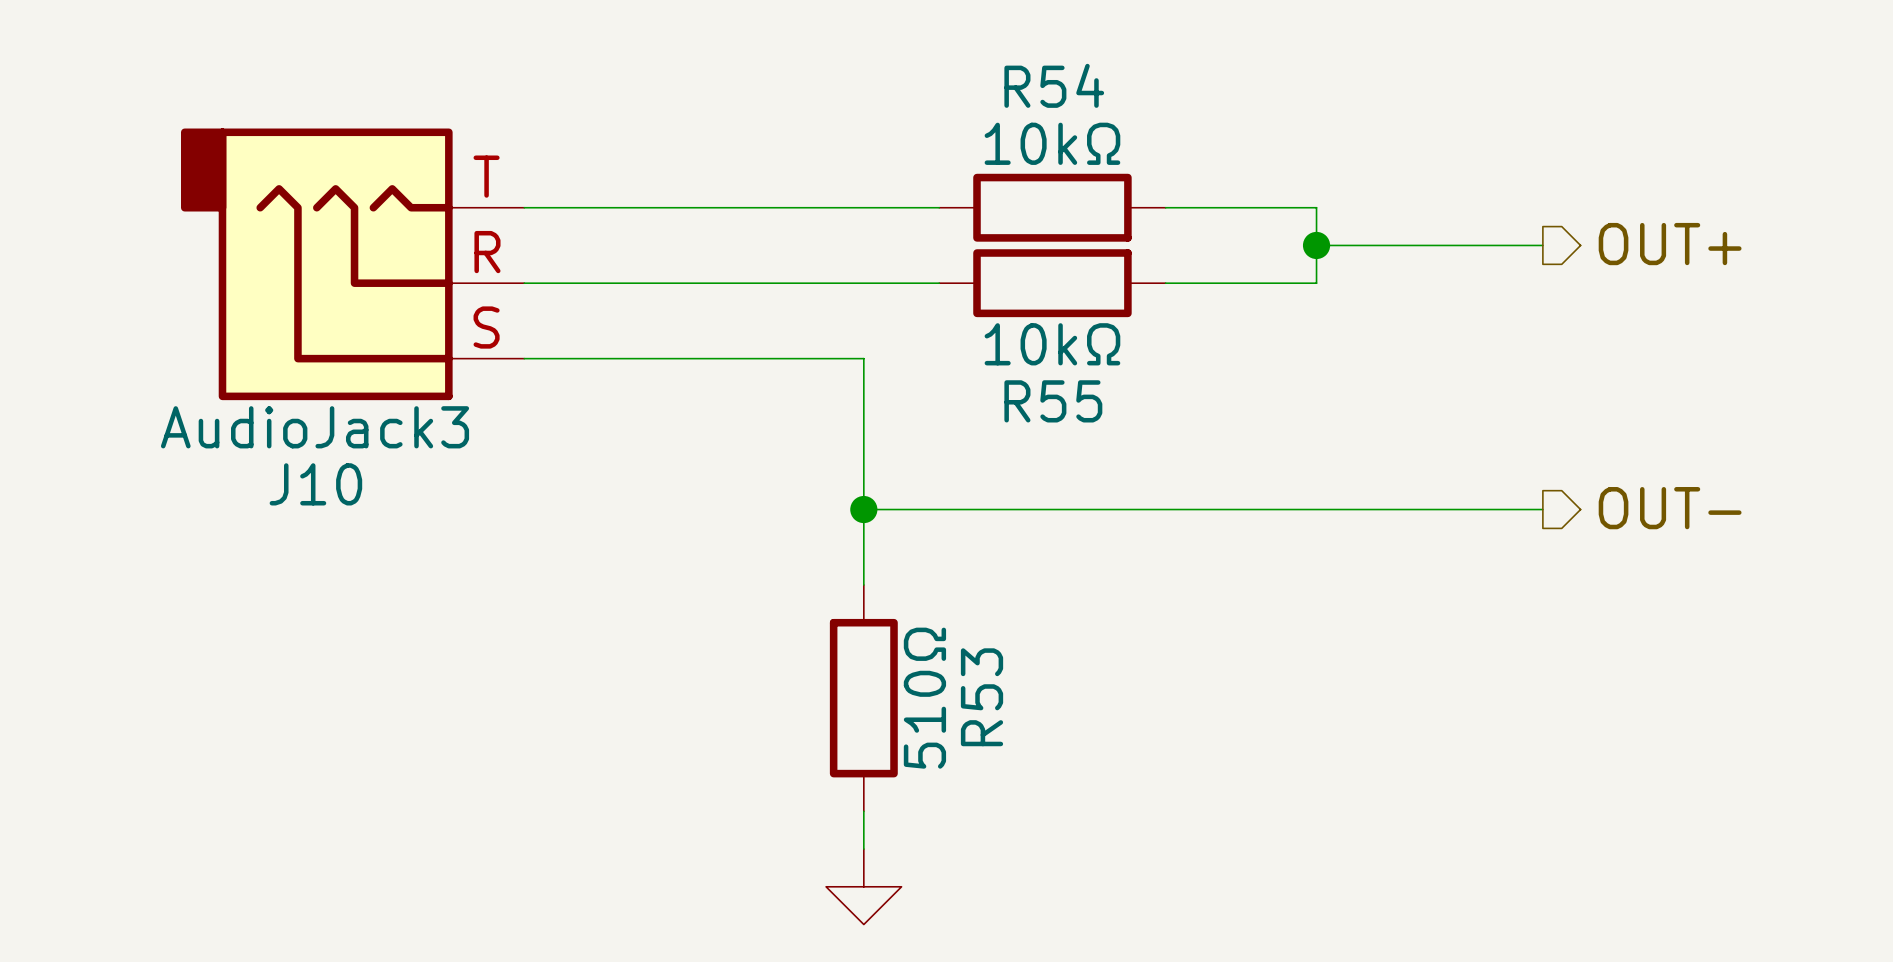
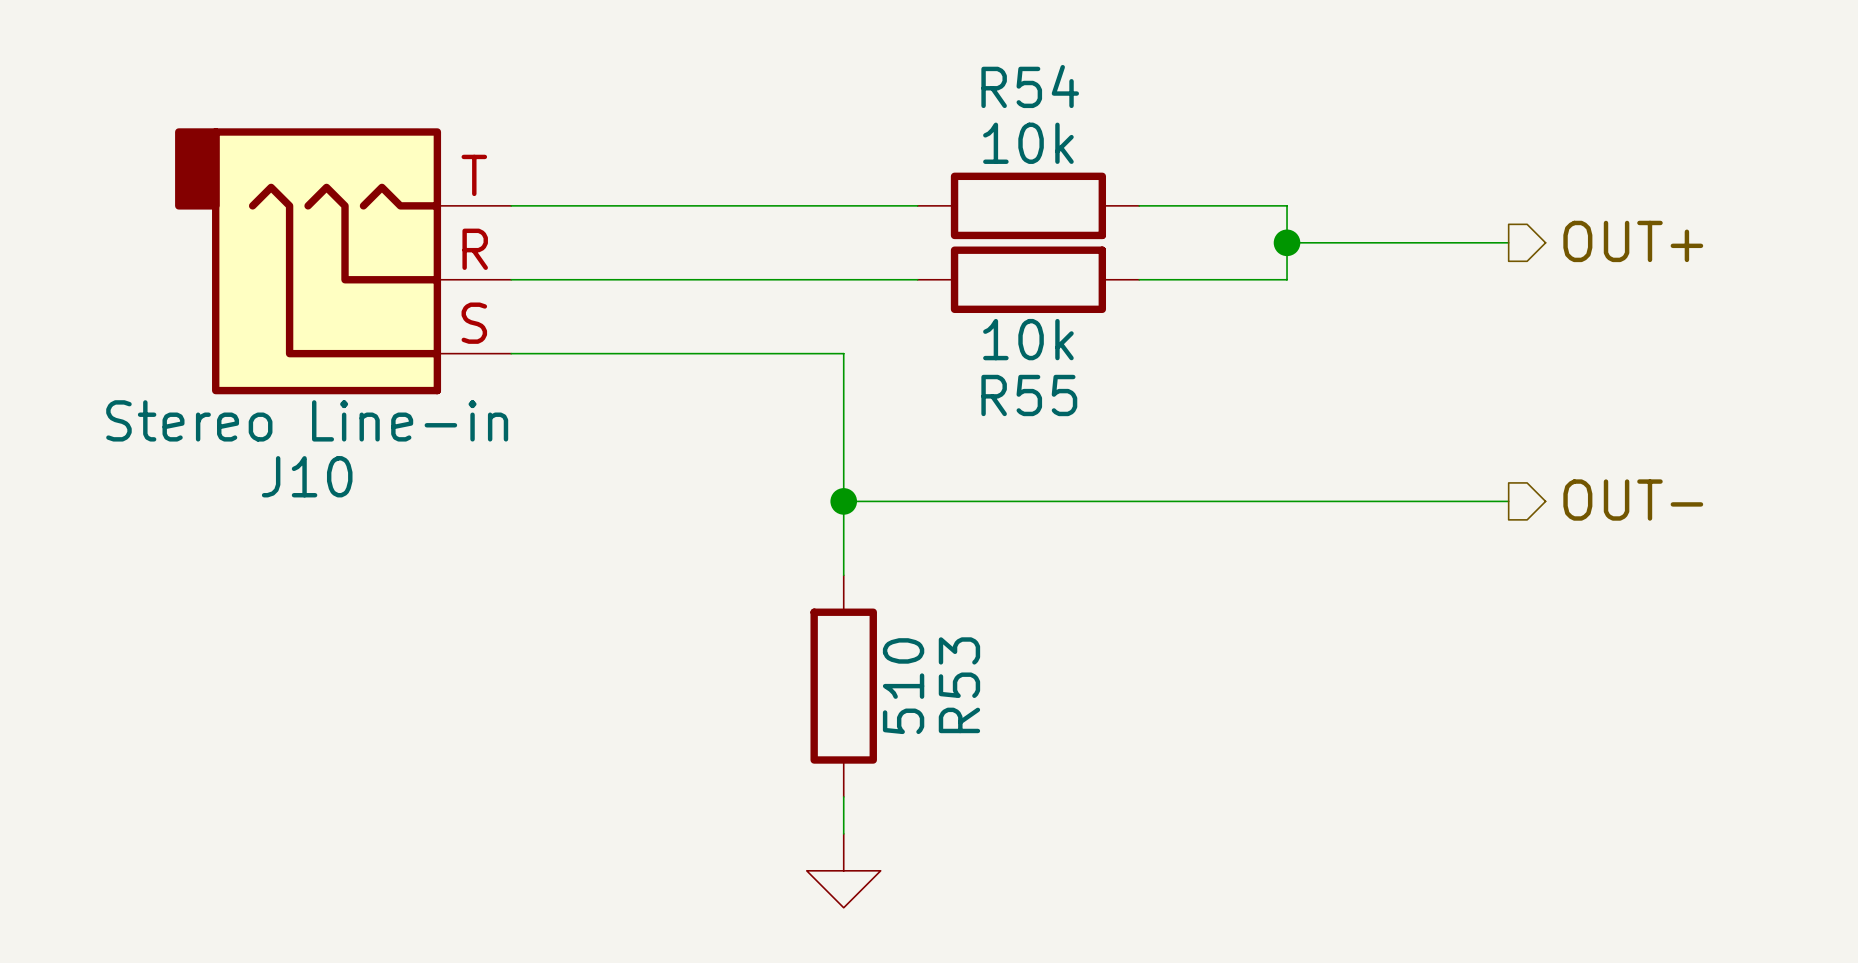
R54 value: 10kΩ (1052, 143) -> 10k (1028, 143)
R55 value: 10kΩ (1052, 344) -> 10k (1028, 339)
J10 value: AudioJack3 (315, 427) -> Stereo Line-in (307, 420)
R53 value: 510Ω (924, 698) -> 510 (903, 686)

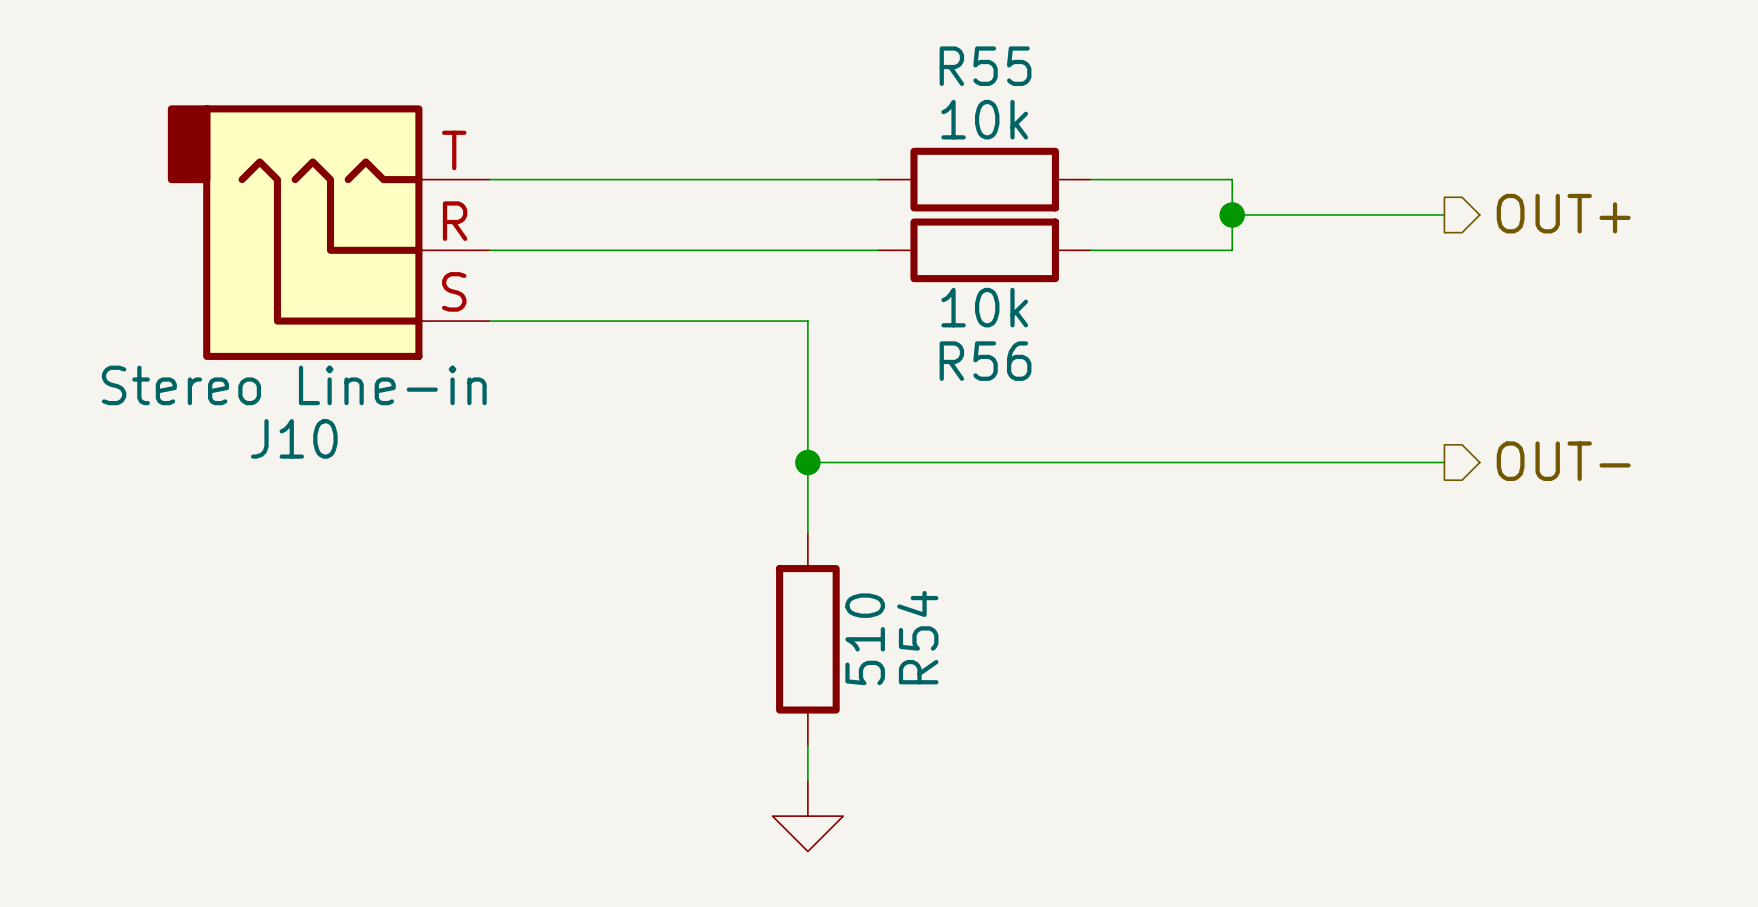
R54 name: R54 (1030, 86) -> R55 (985, 66)
R55 name: R55 (1029, 395) -> R56 (985, 361)
R53 name: R53 (959, 685) -> R54 (917, 637)

